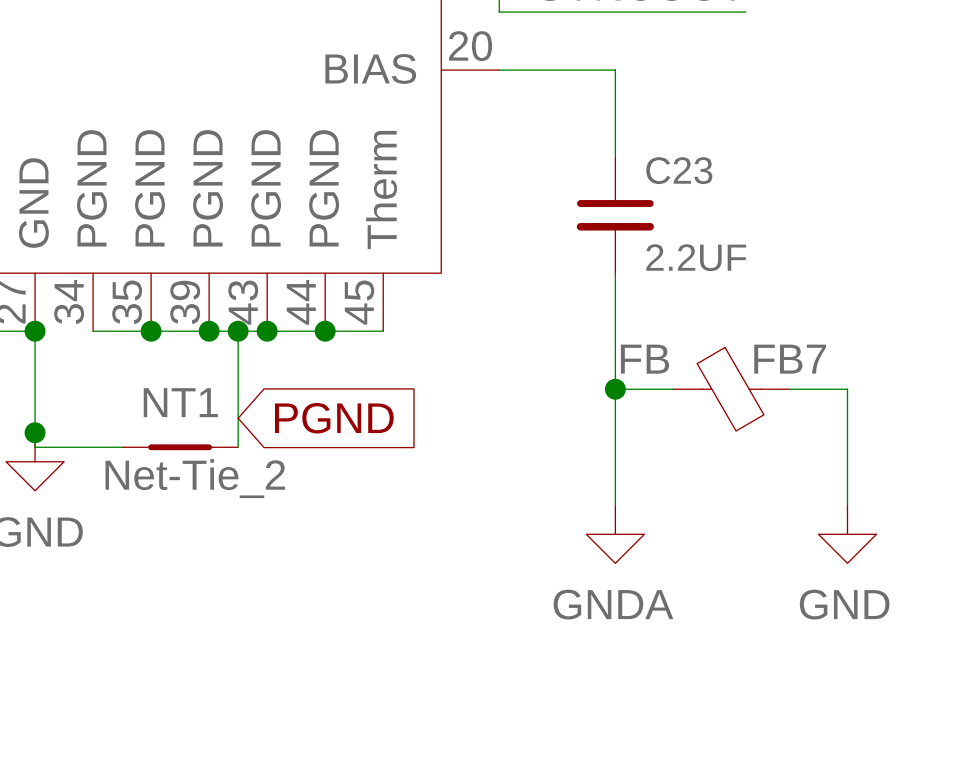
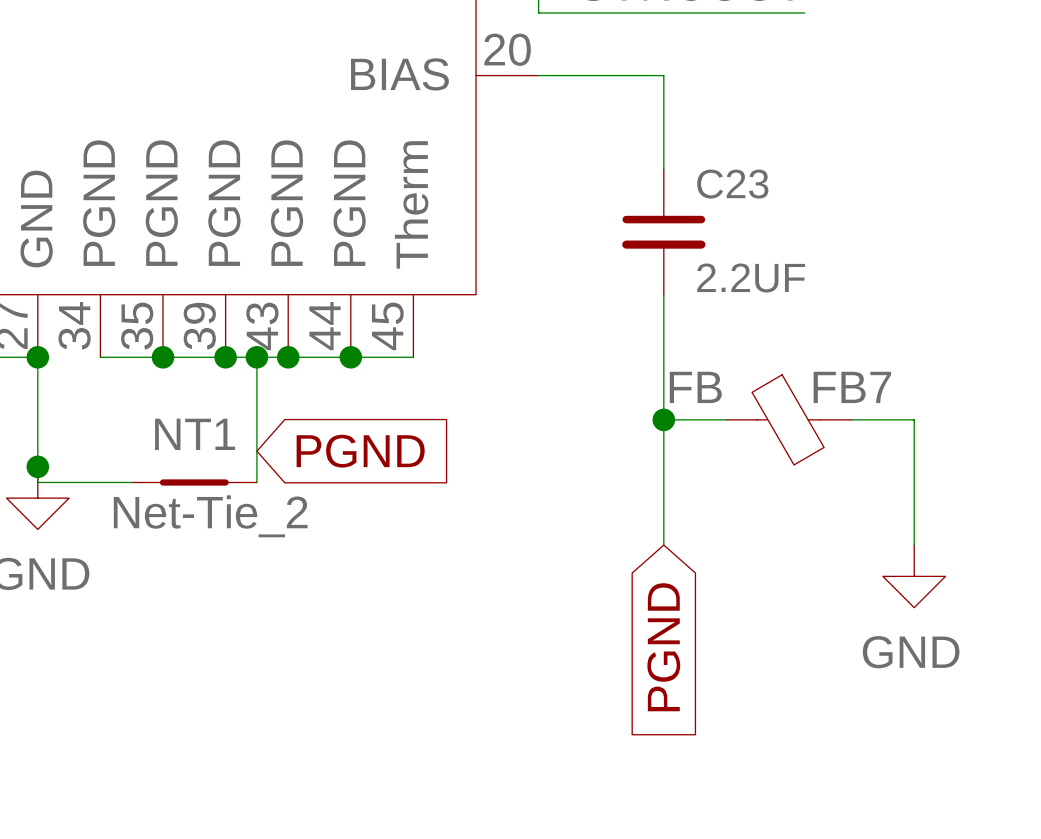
power symbol: GNDA (615, 534) -> none
global label: none -> PGND (663, 647)

